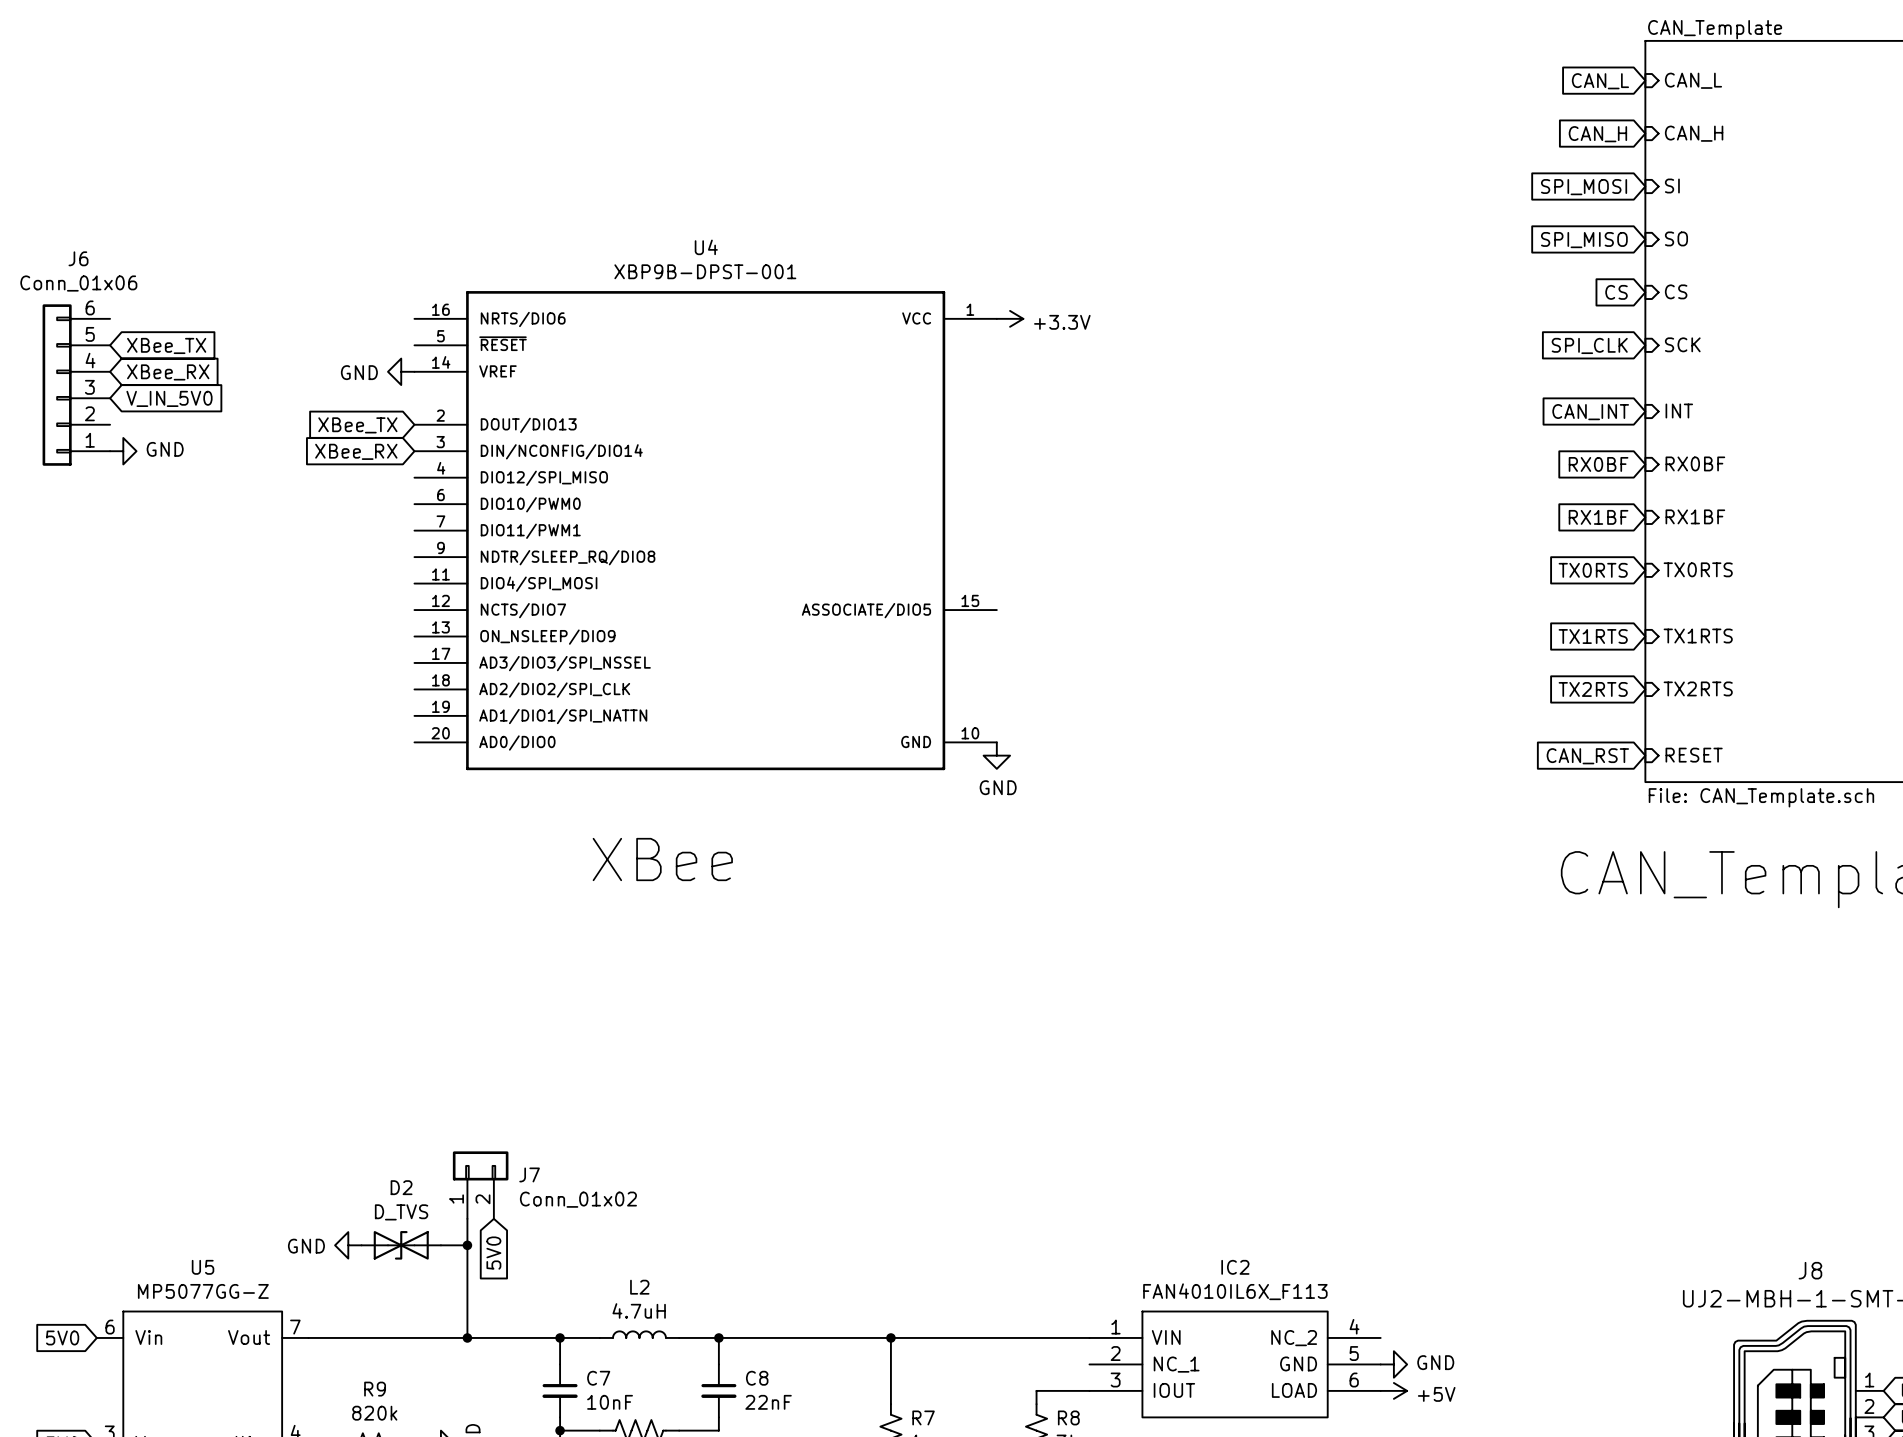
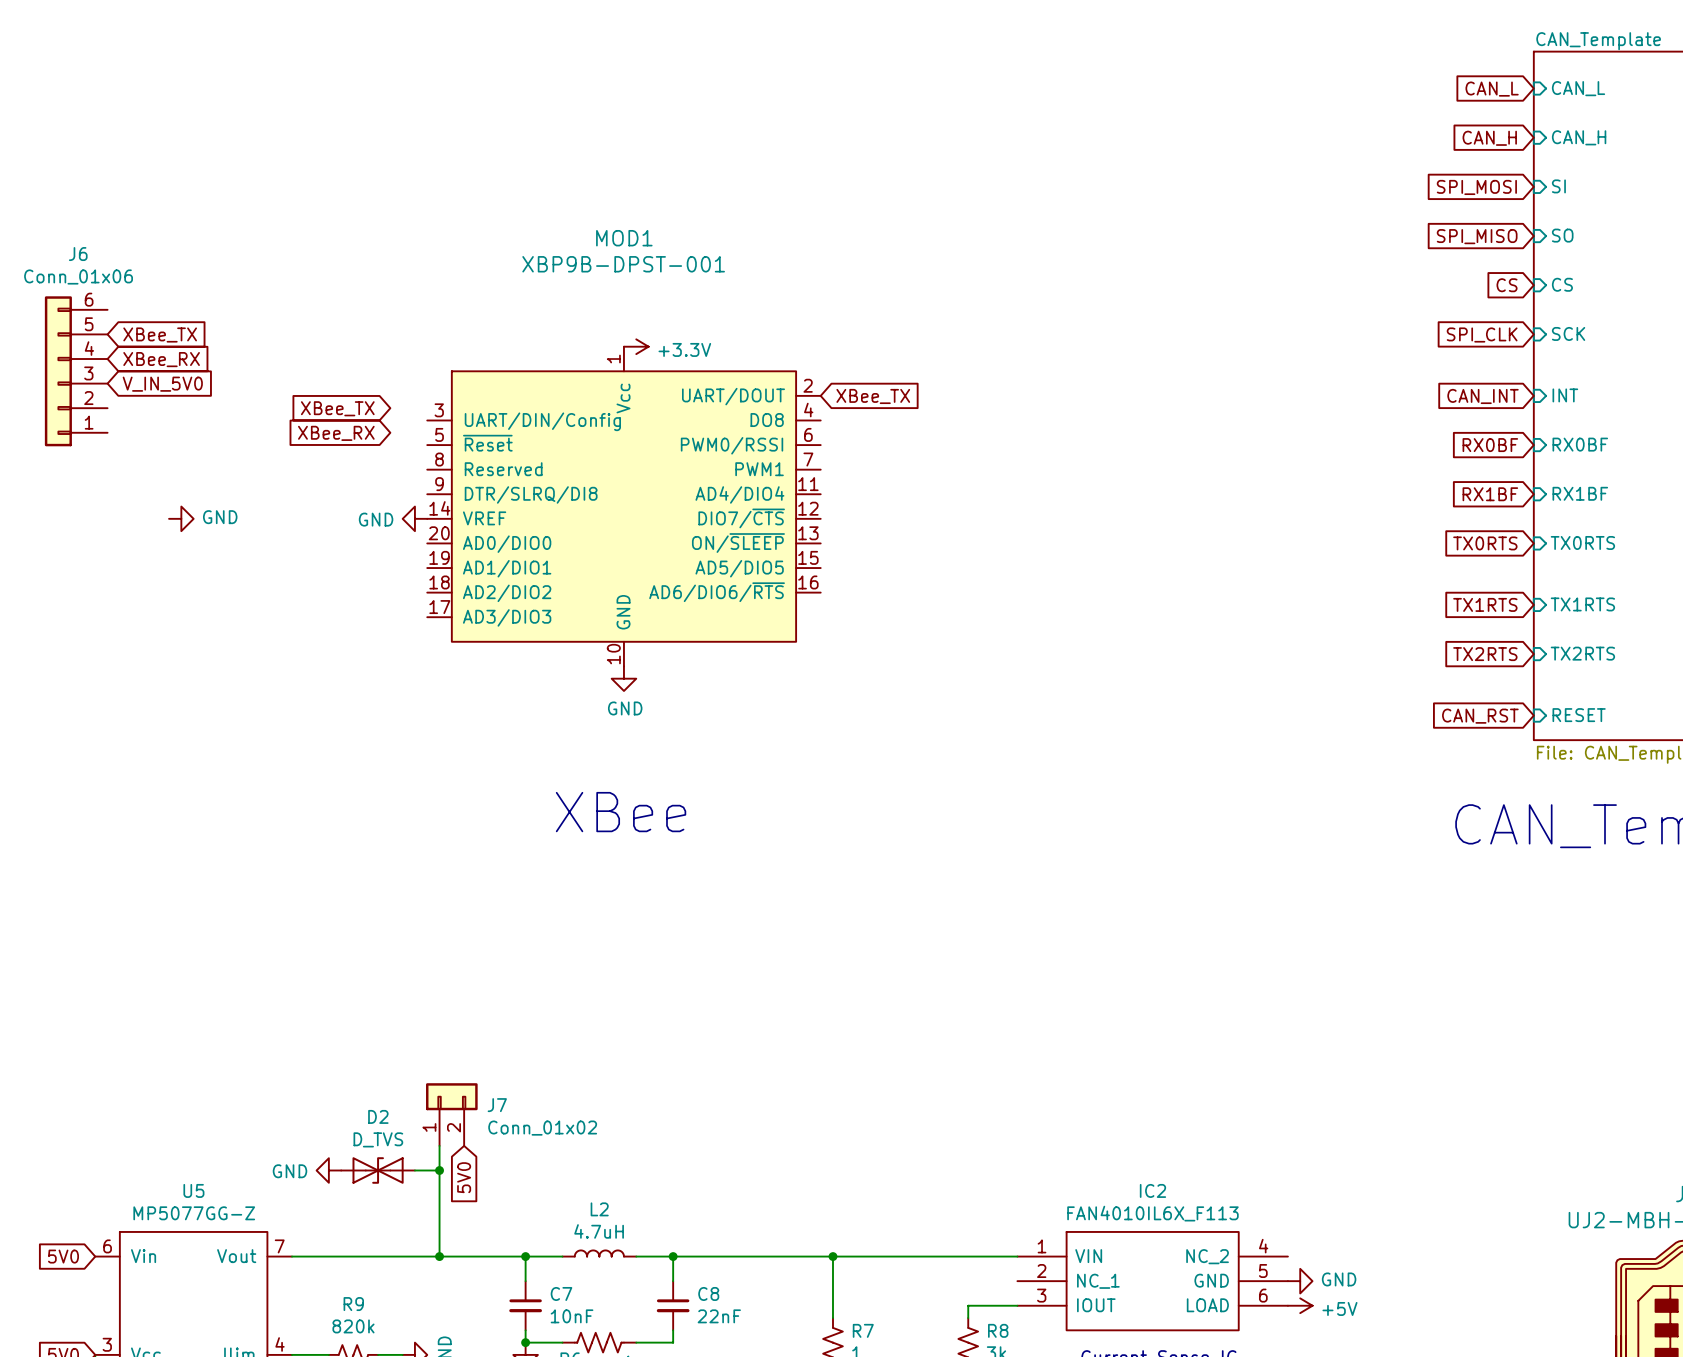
power symbol: +3.3V (1010, 318) -> none
power symbol: none -> +3.3V (636, 346)
power symbol: GND (401, 371) -> none
global label: none -> XBee_TX (873, 396)
power symbol position: GND (123, 451) -> GND (181, 518)
MOD1: none -> XBP9B-DPST-001 (623, 506)
U4: XBP9B-DPST-001 (705, 530) -> none
power symbol: none -> GND (414, 518)
power symbol: none -> GND (623, 678)
power symbol: GND (996, 755) -> none

